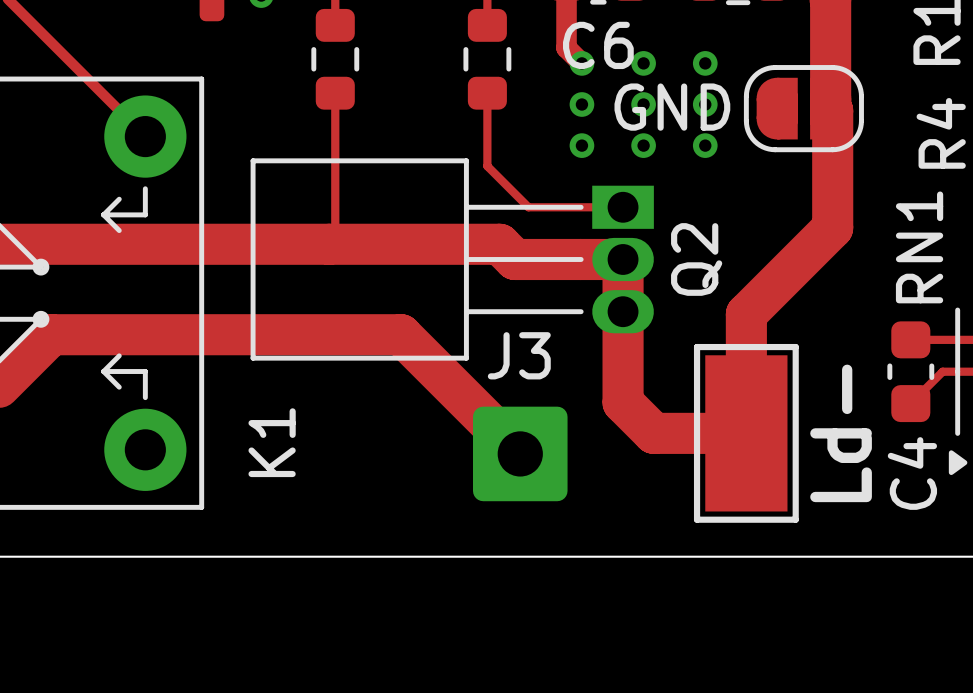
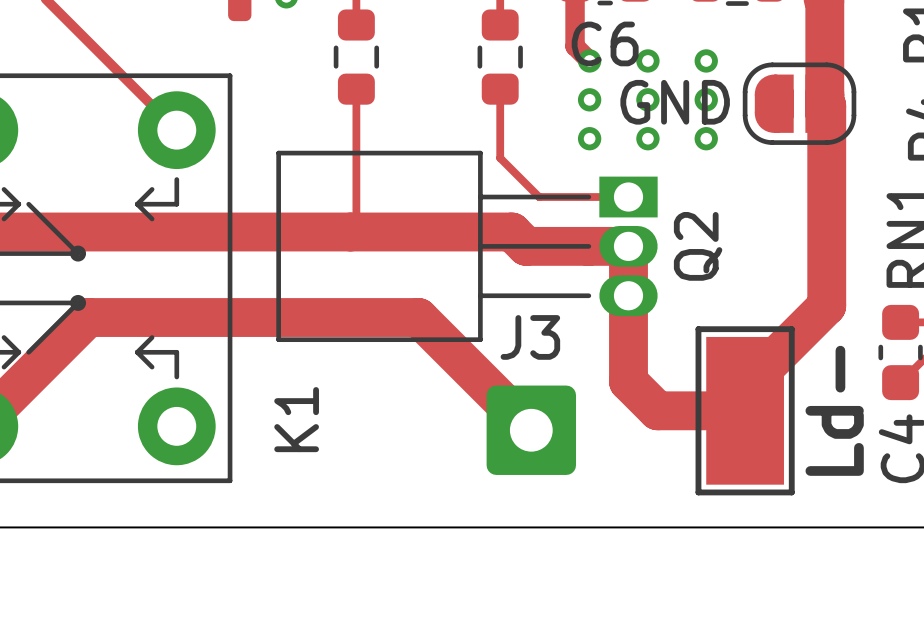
track: (832, 227) (746, 314) (746, 408) -> (826, 216) (826, 305) (745, 387)

